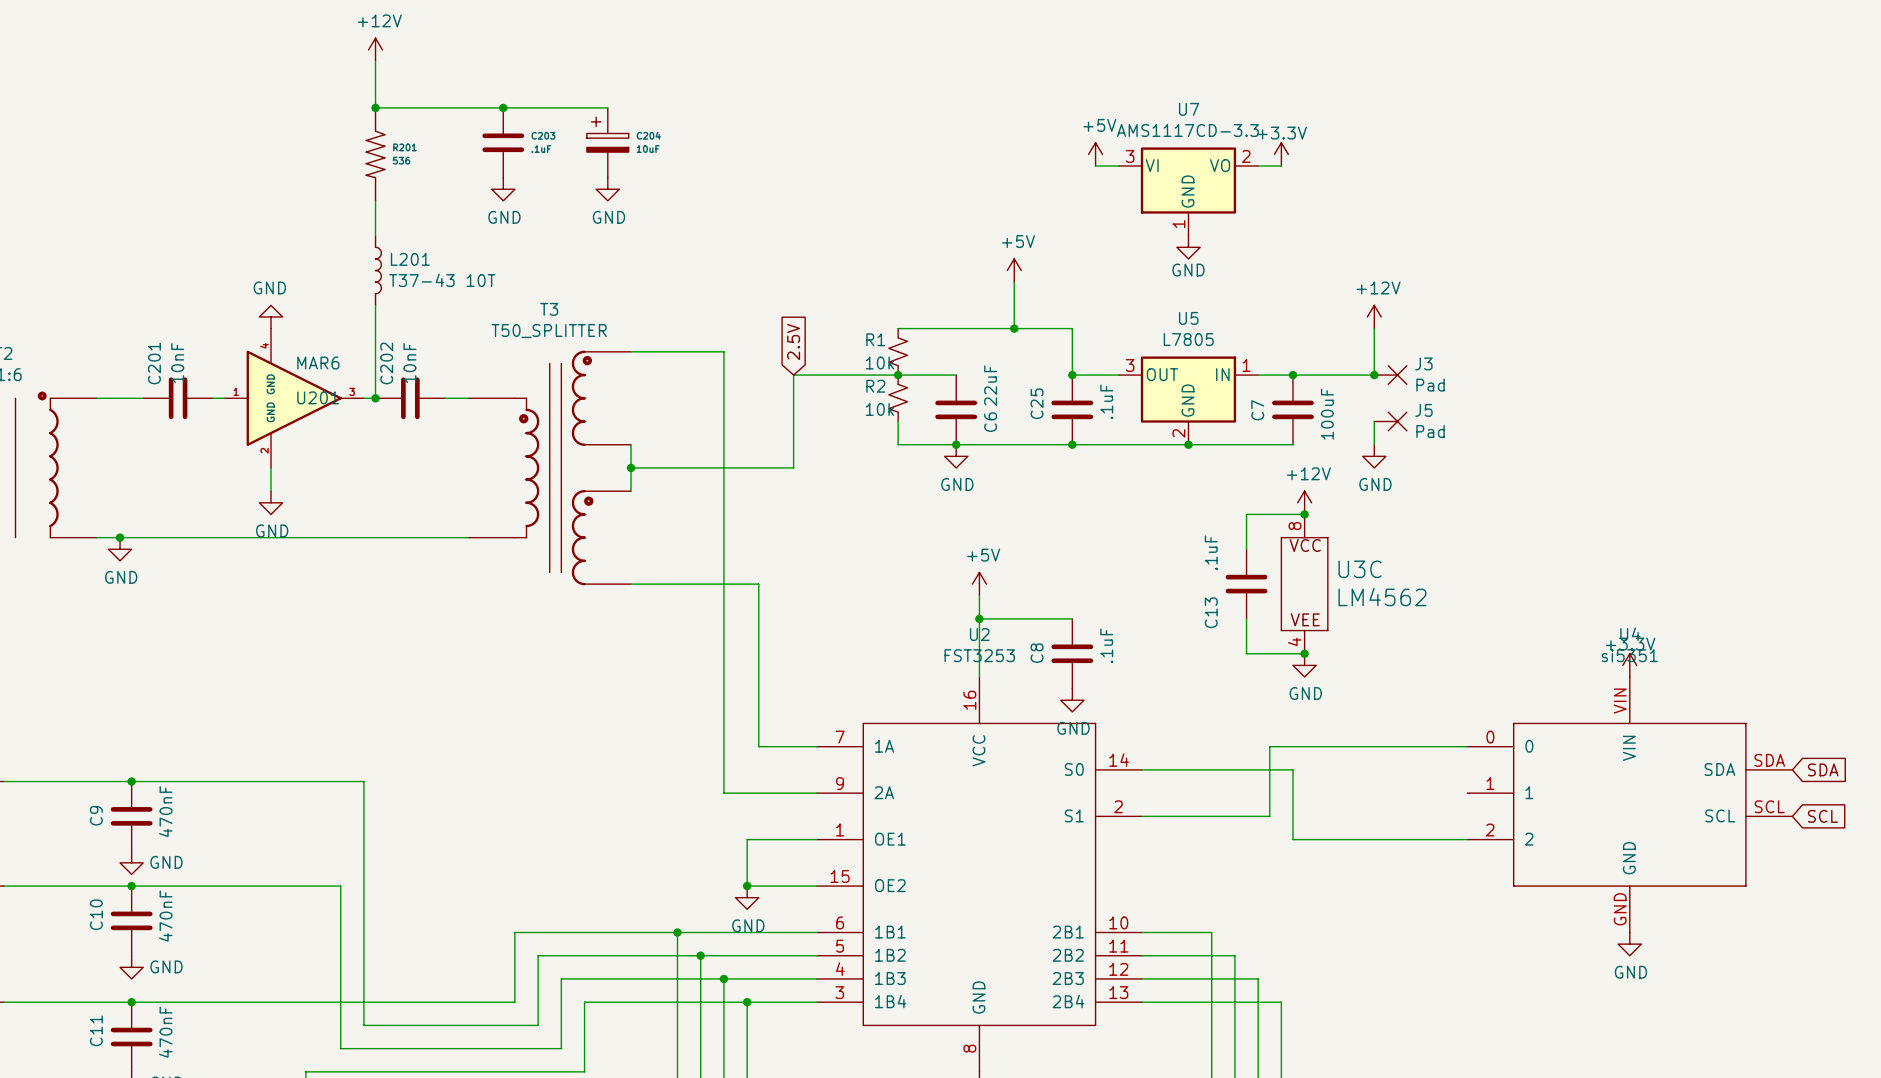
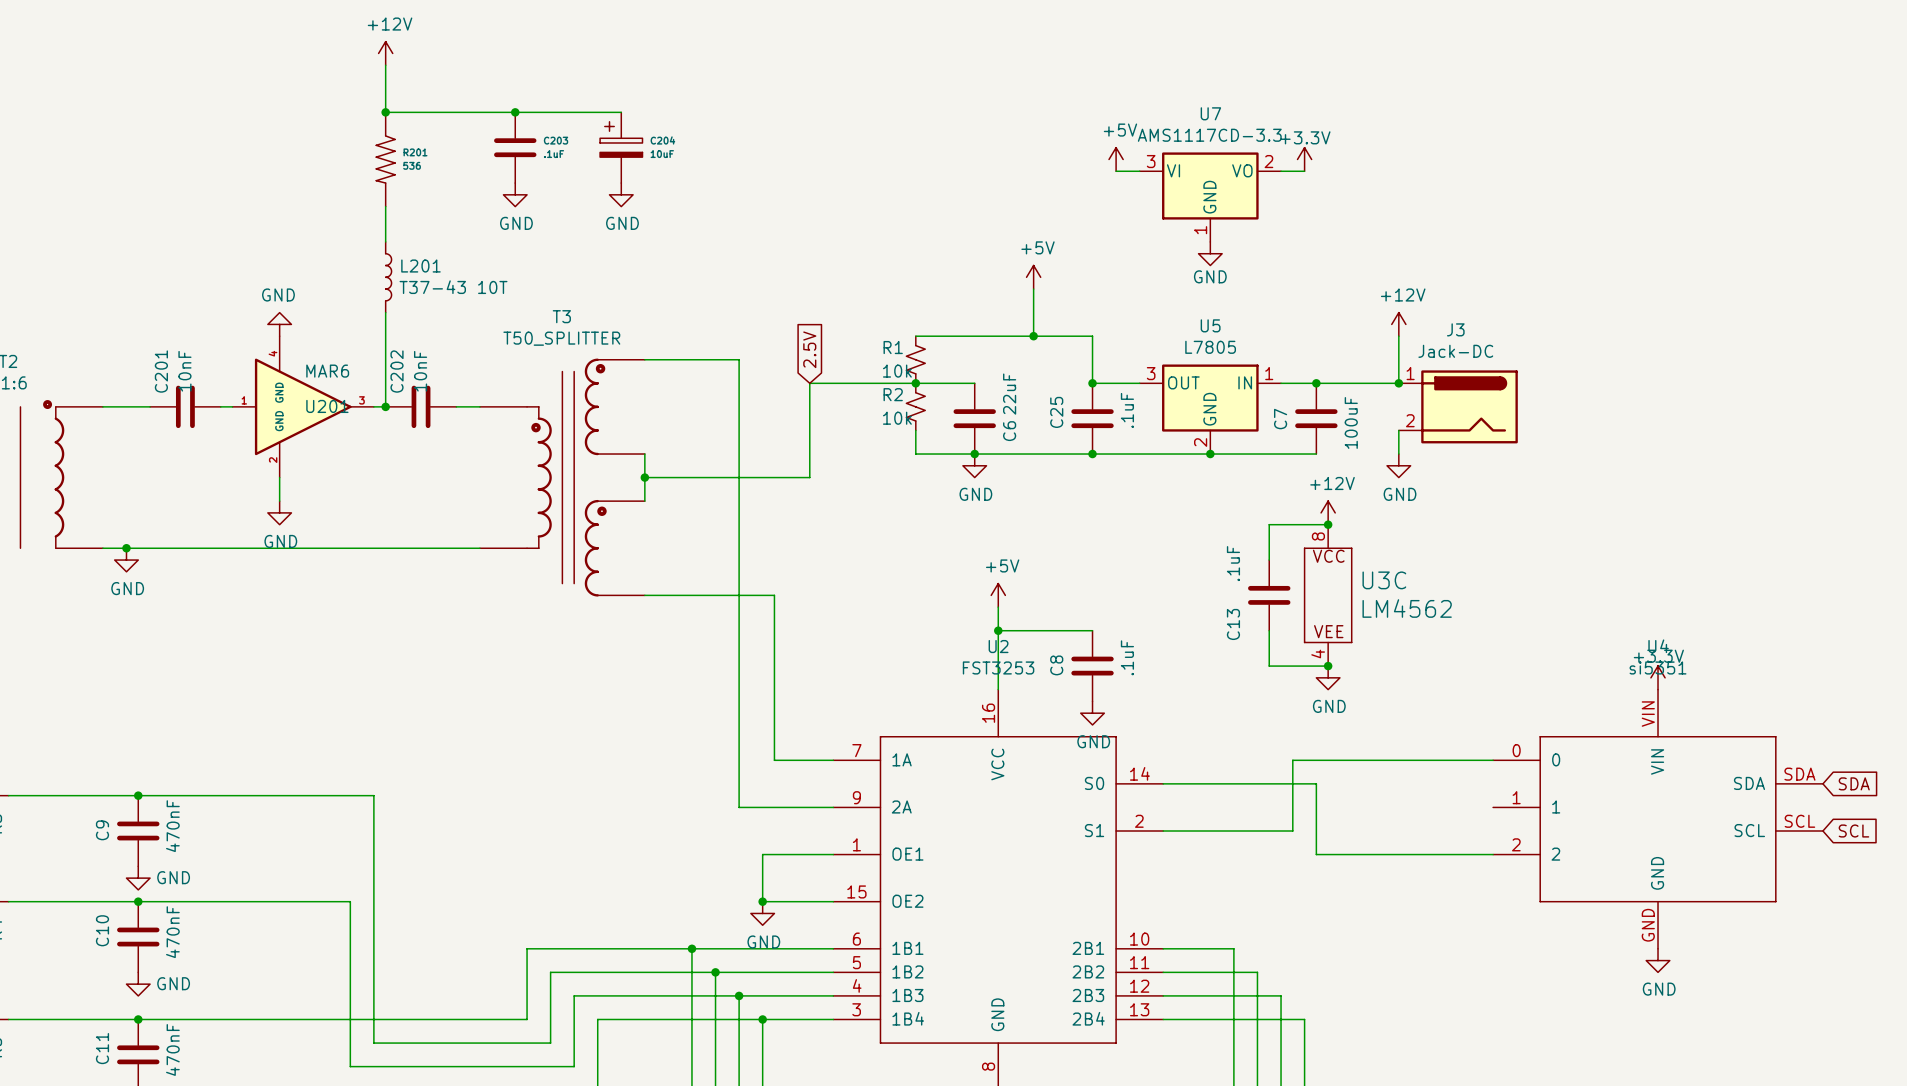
J3 name position: J3 (1423, 363) -> J3 (1455, 329)
J3 symbol: [1374, 365, 1407, 385] -> [1398, 370, 1518, 444]
J3 value: Pad (1430, 385) -> Jack-DC (1455, 351)
J5: Pad (1390, 421) -> none

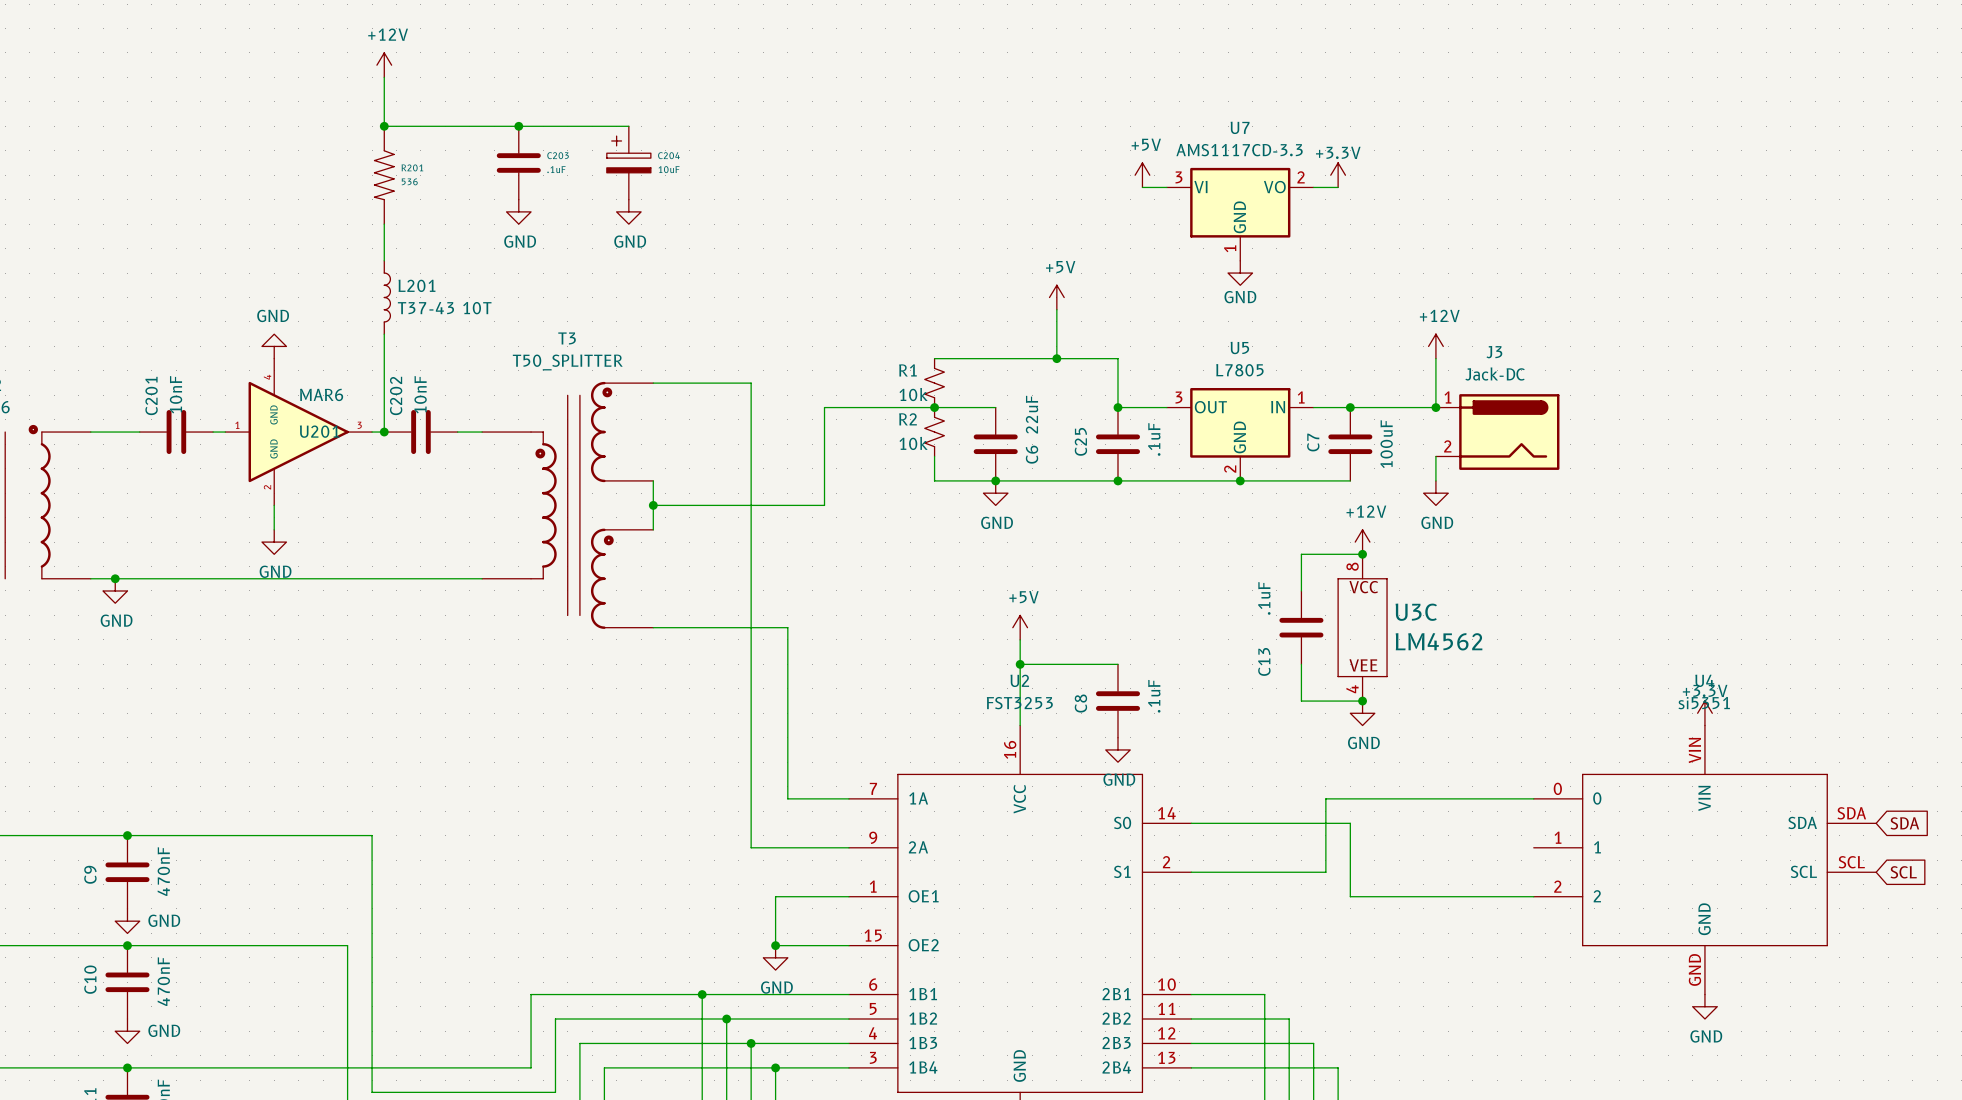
global label: 2.5V (809, 349) -> none

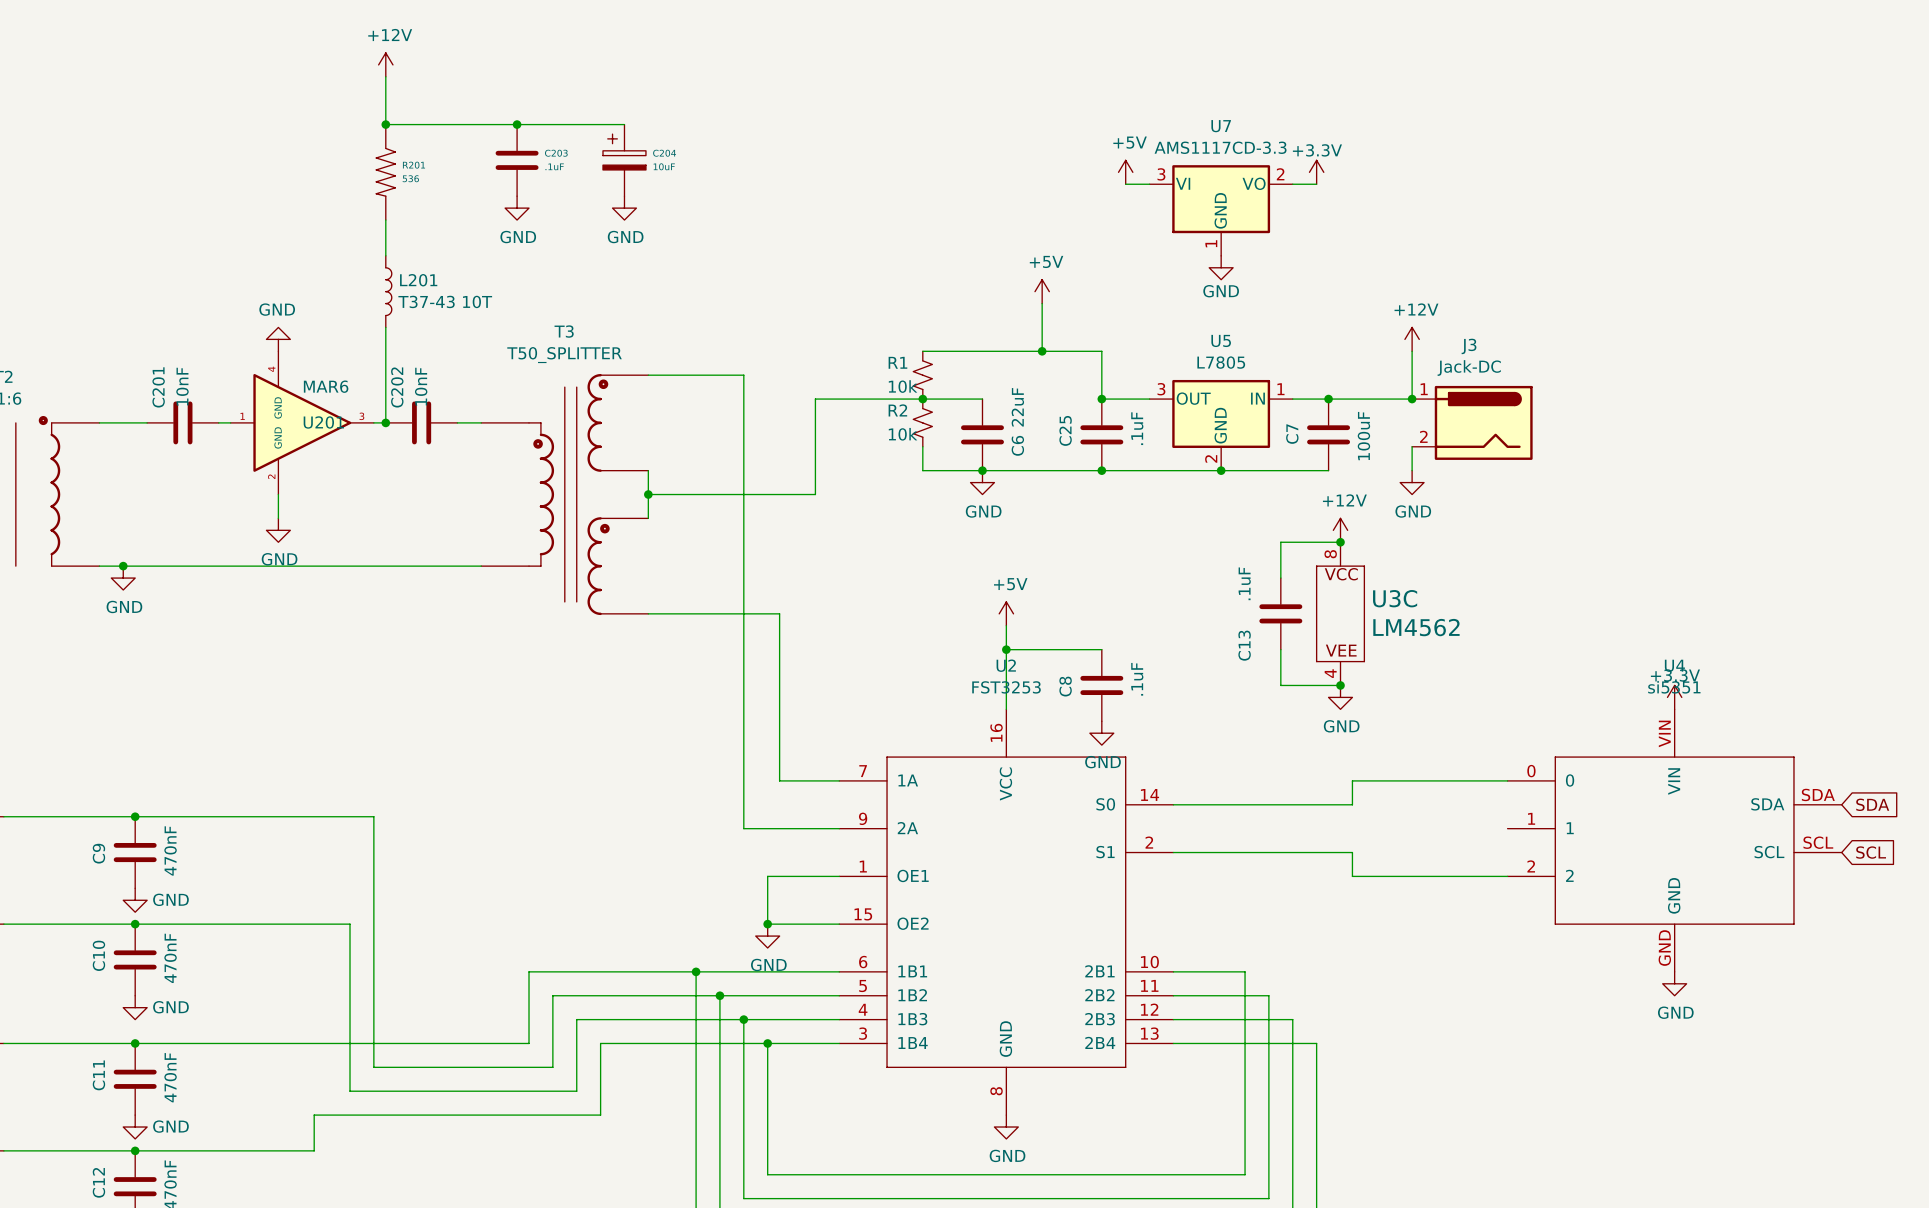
wire: (1374, 798) (1325, 798) (1325, 872) -> (1352, 780) (1352, 804) (1328, 804)
wire: (1350, 823) (1350, 896) (1374, 896) -> (1304, 852) (1352, 852) (1352, 876)

